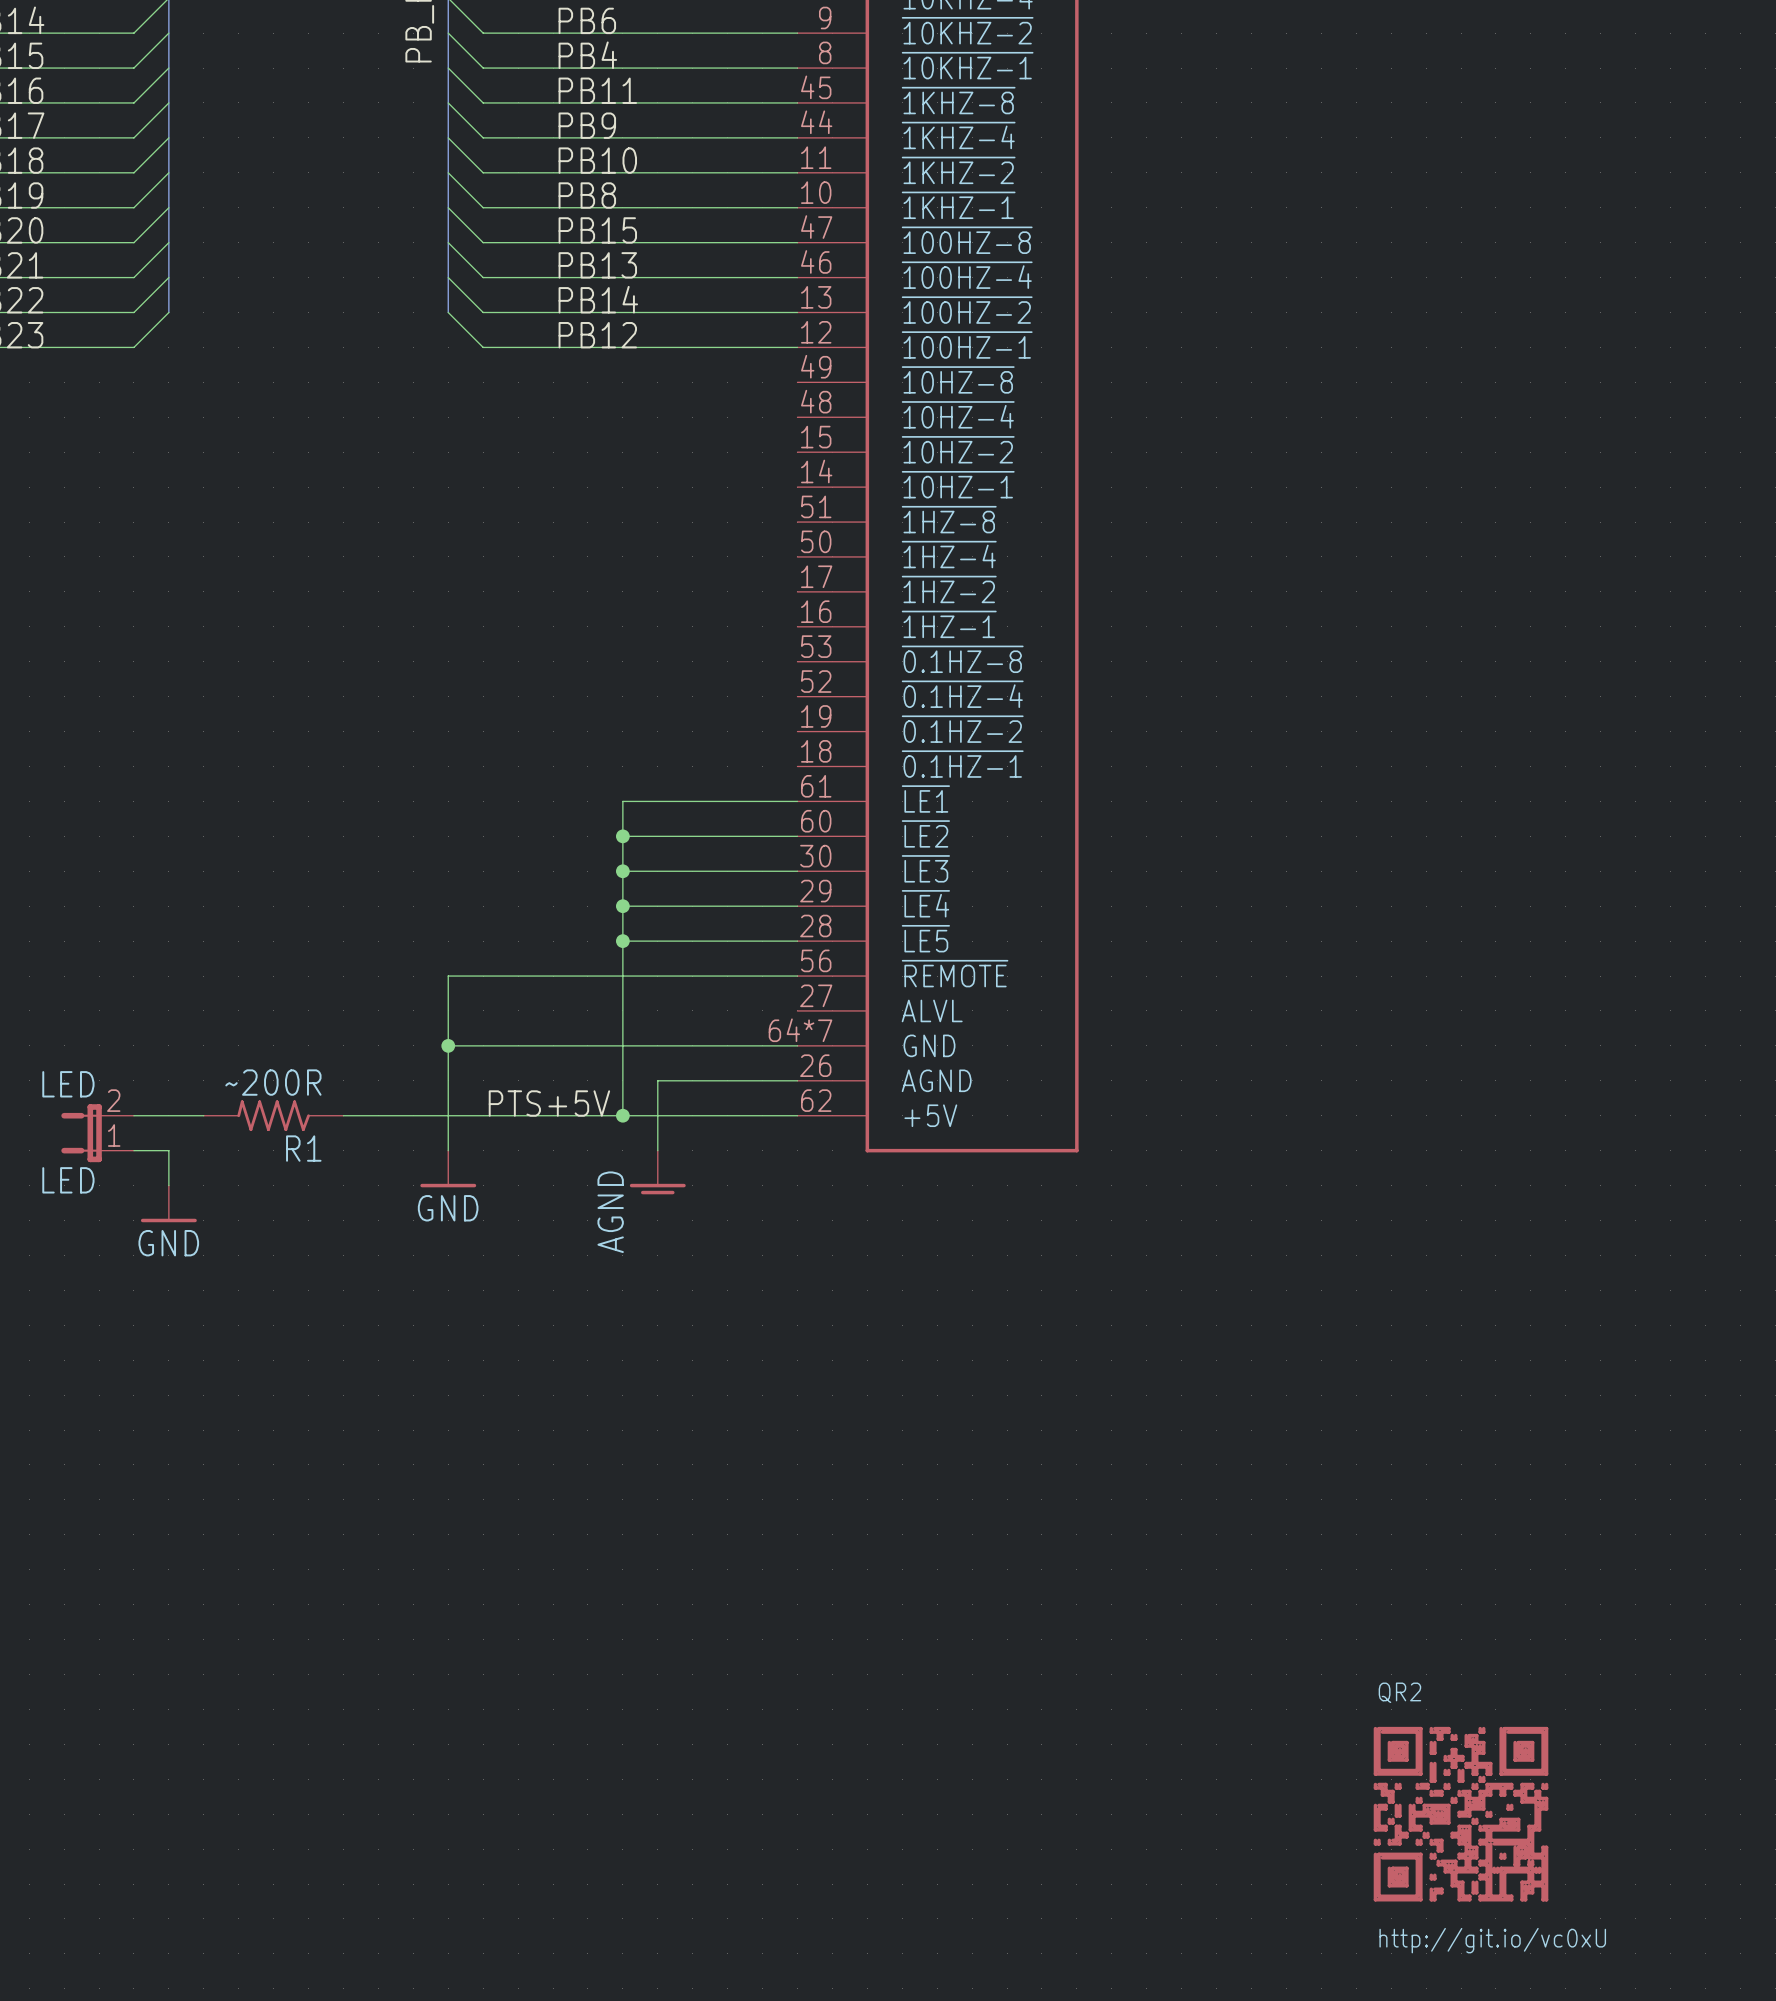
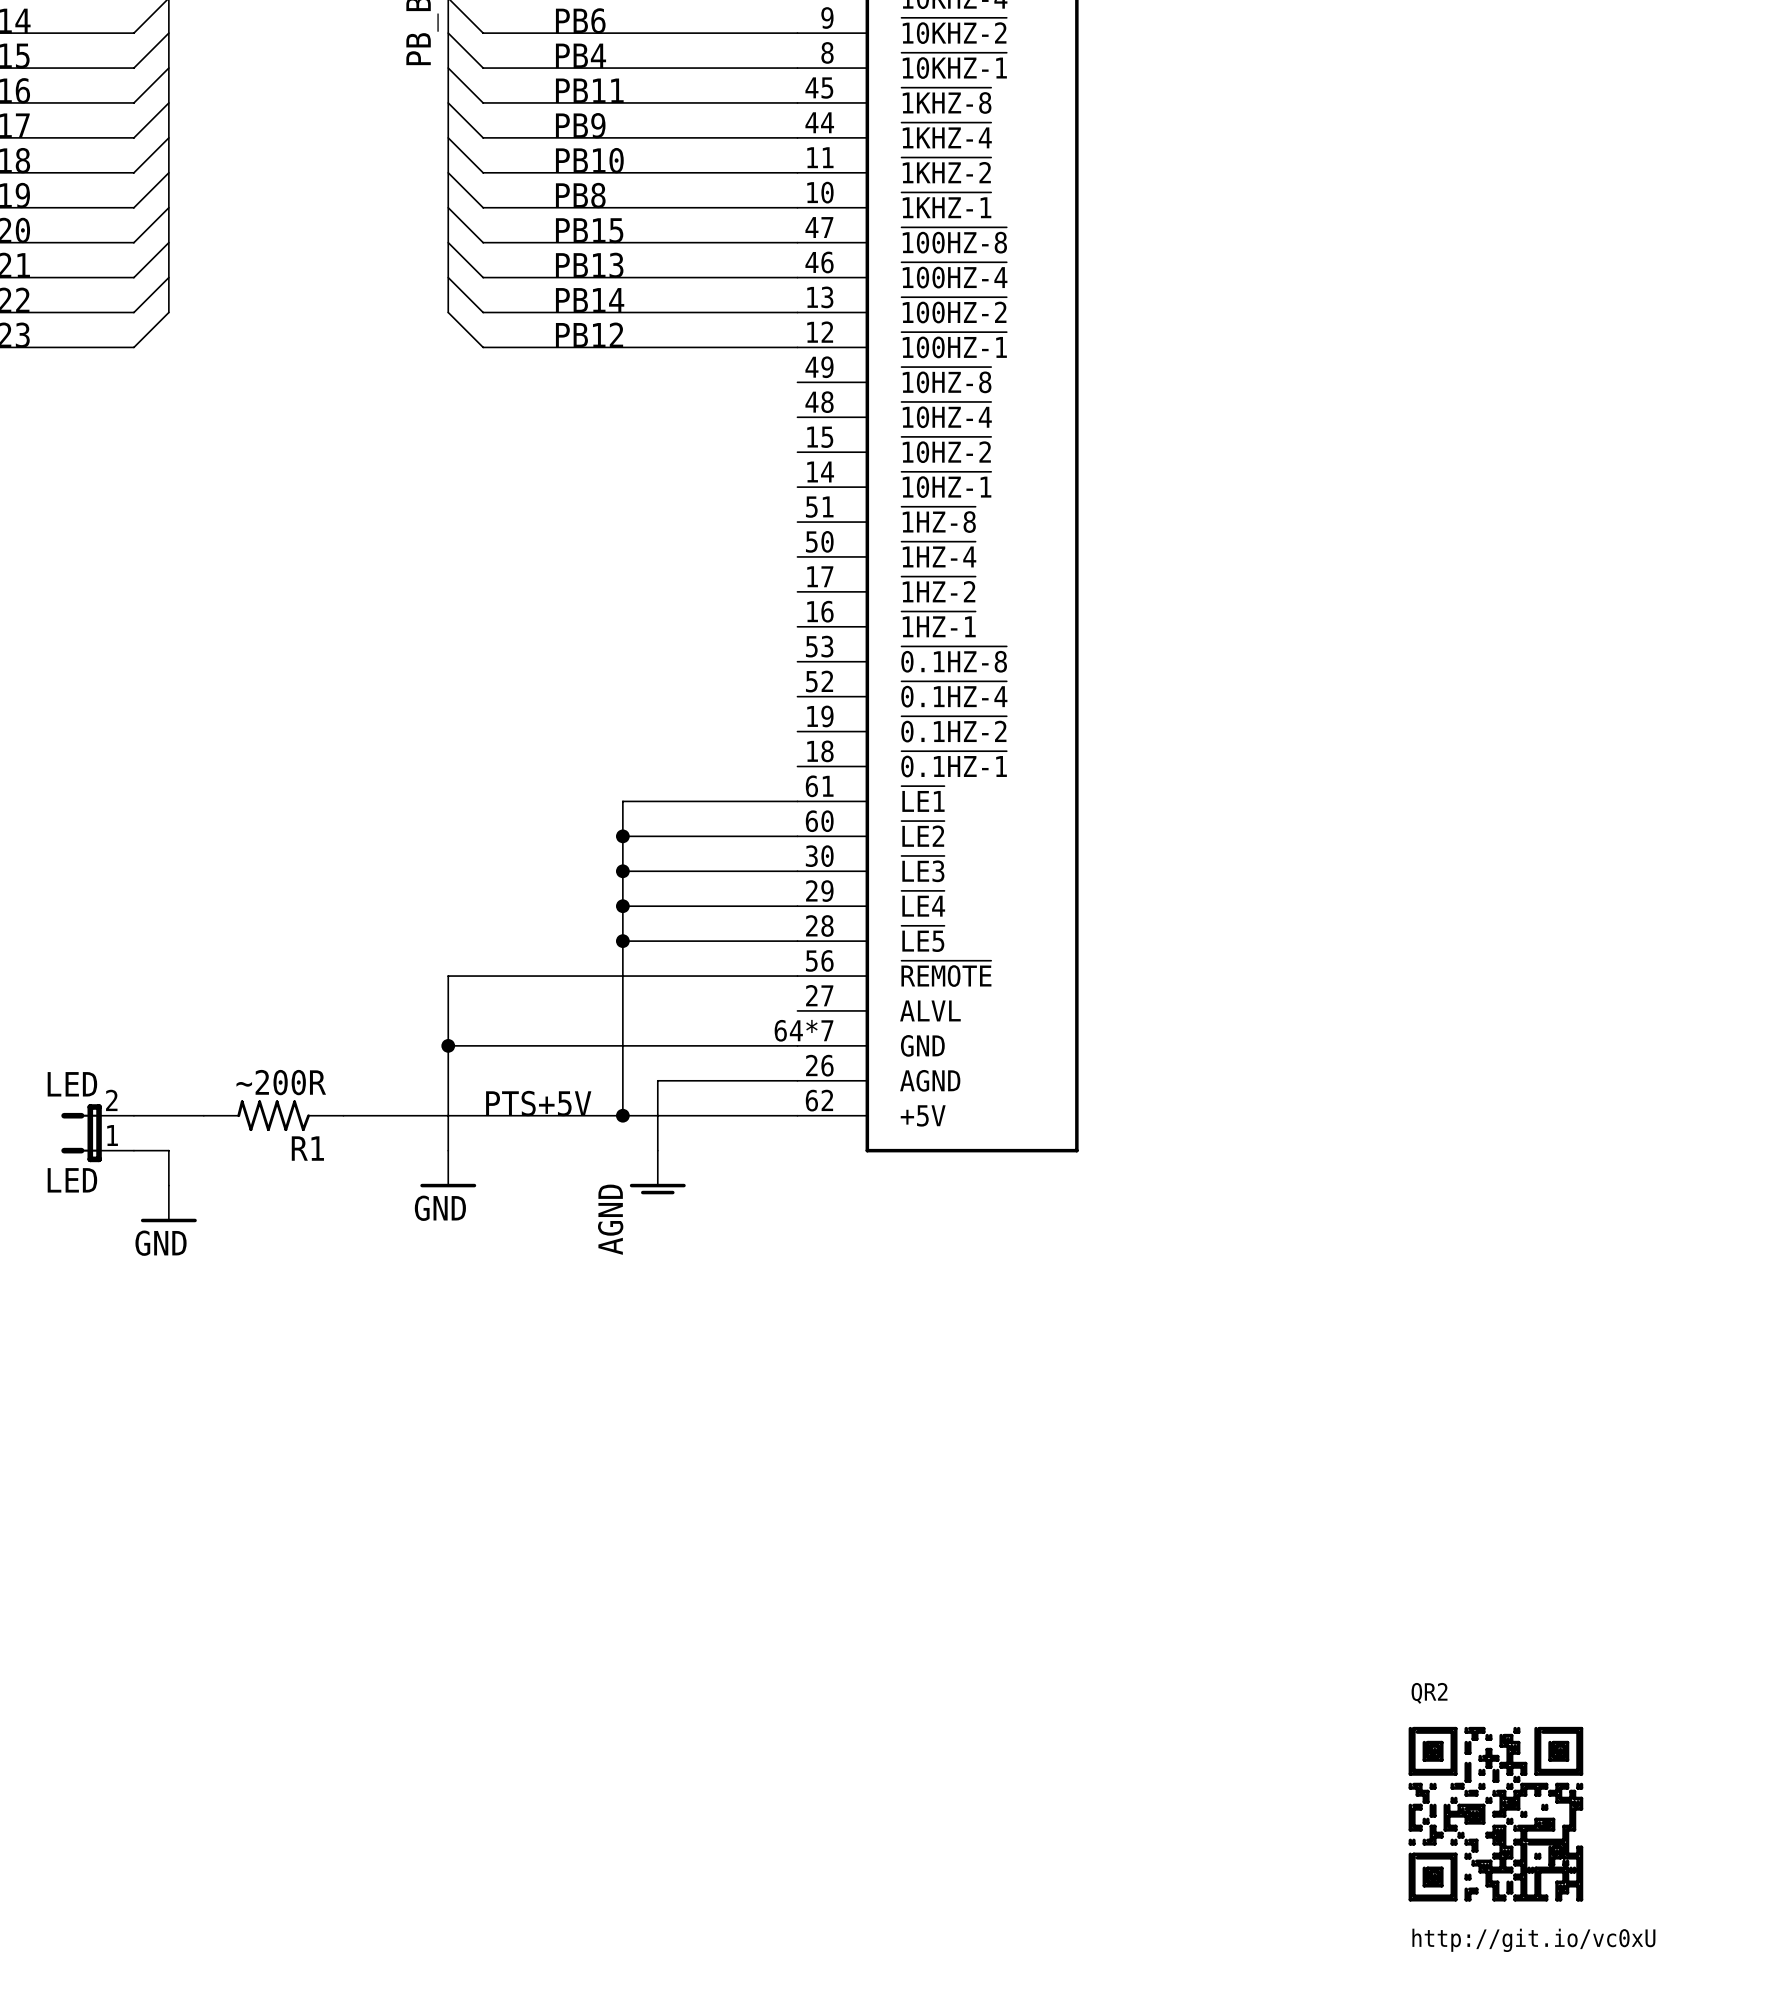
QR2 position: (1461, 1814) -> (1495, 1814)

